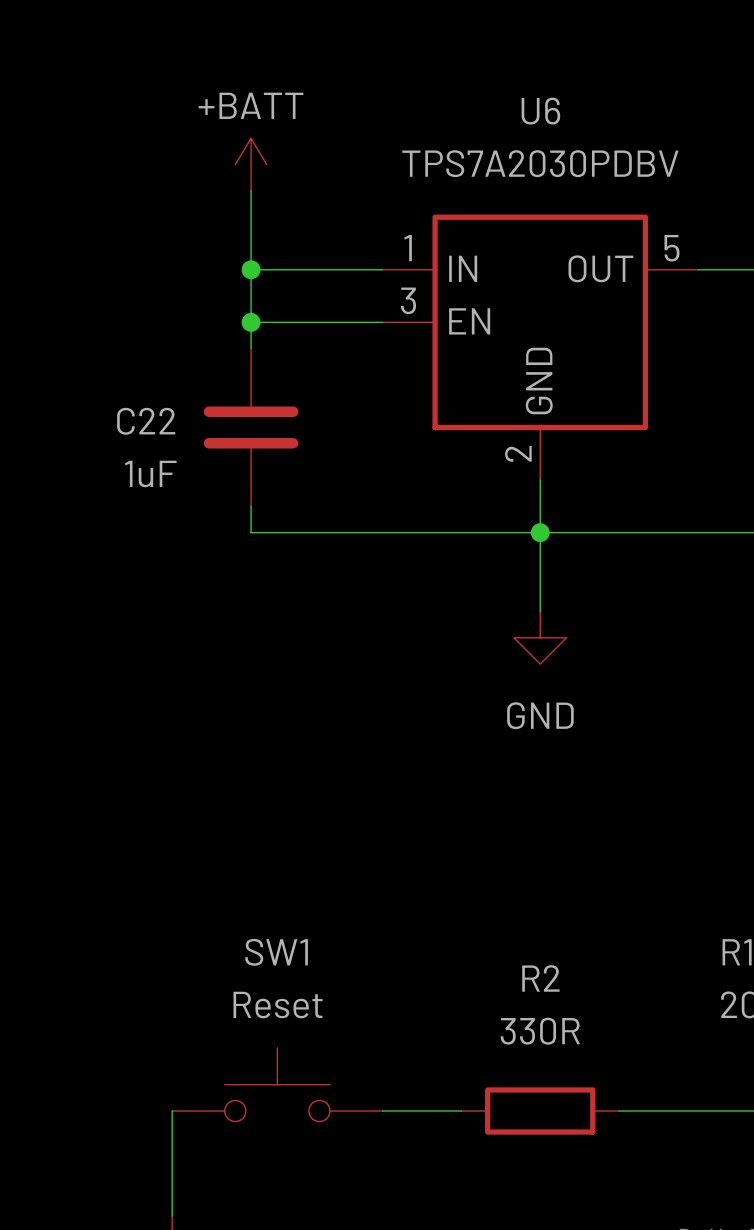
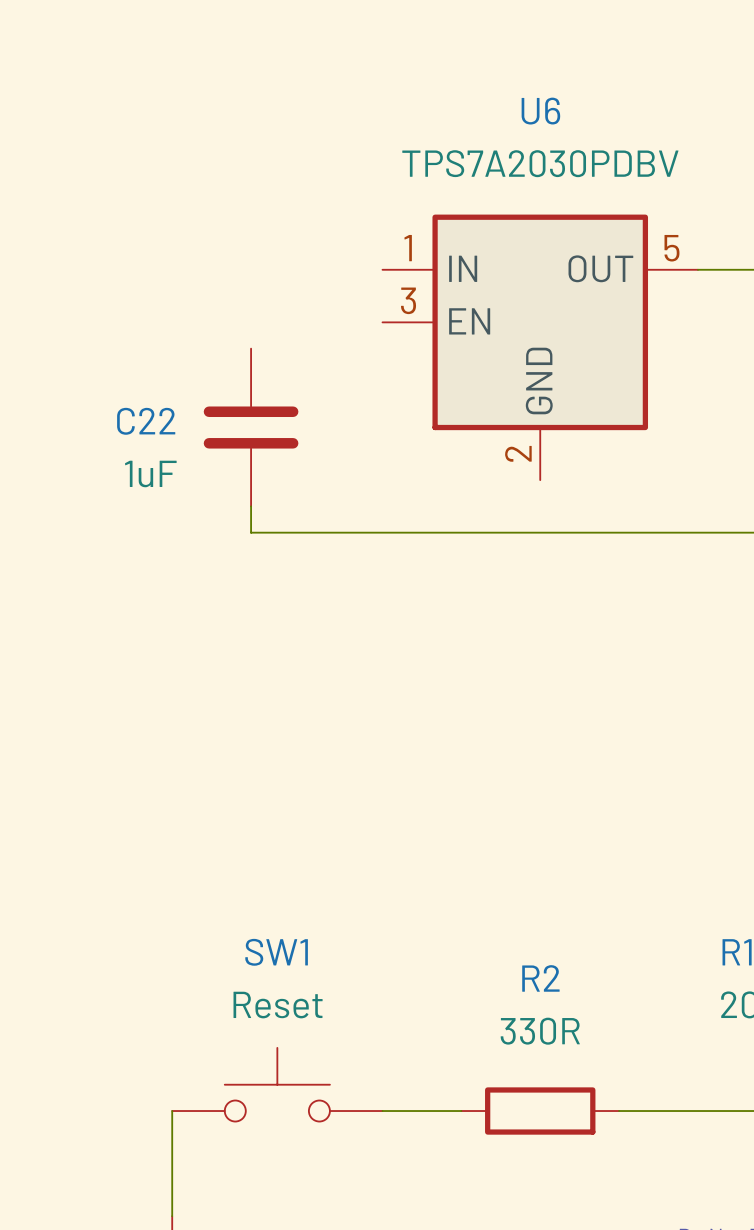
power symbol: +BATT (251, 164) -> none
wire: (251, 190) (251, 348) -> none
wire: (251, 269) (382, 269) -> none
junction: (251, 269) -> none
wire: (251, 322) (382, 322) -> none
junction: (251, 322) -> none
wire: (540, 480) (540, 611) -> none
junction: (540, 532) -> none
power symbol: GND (540, 637) -> none

